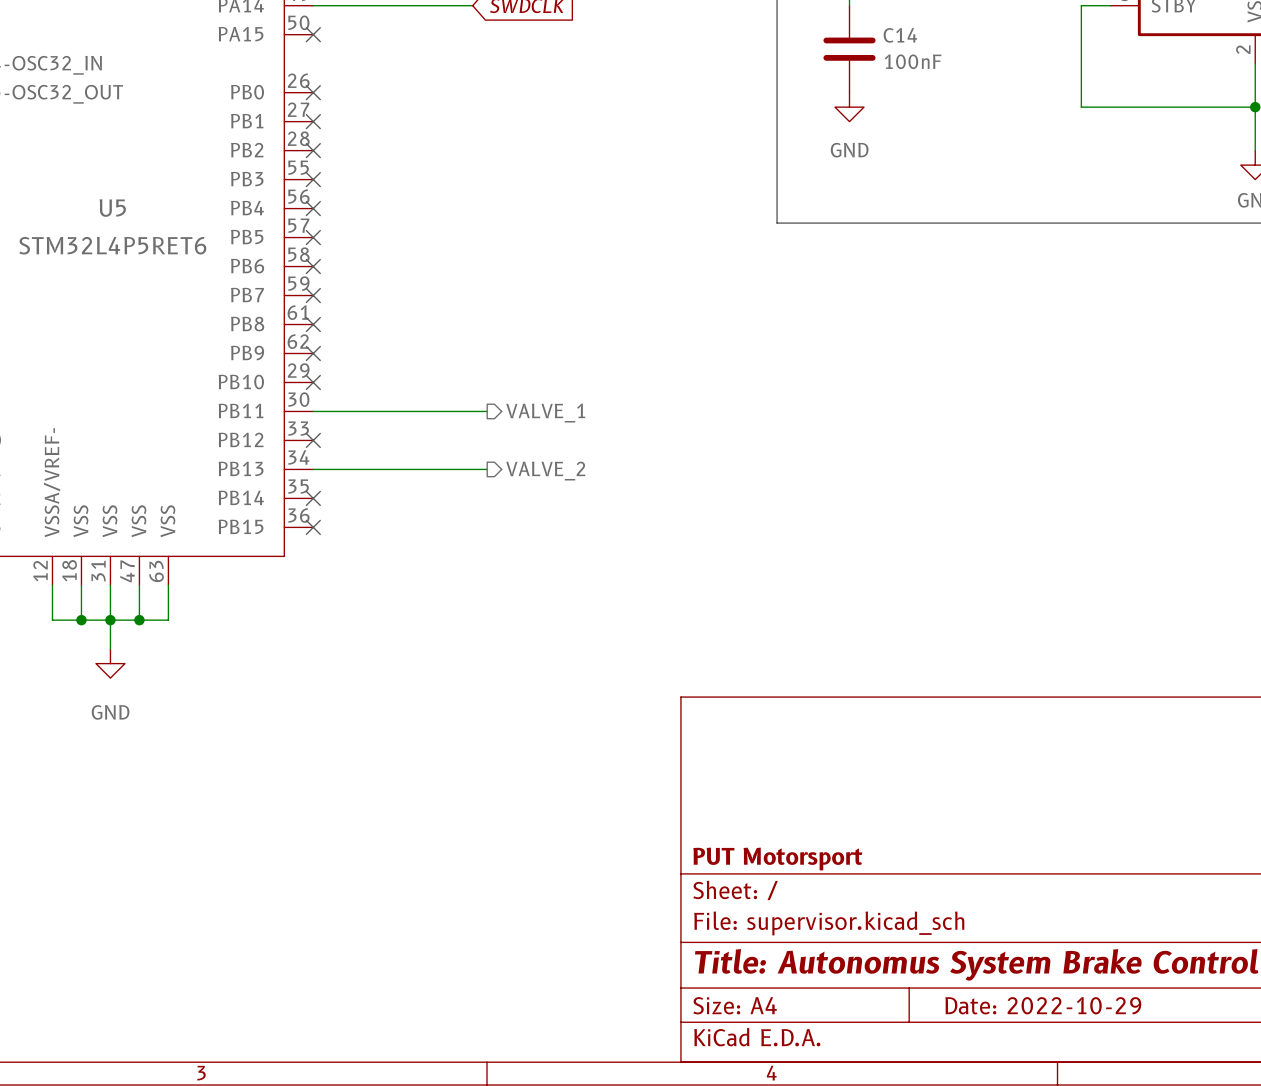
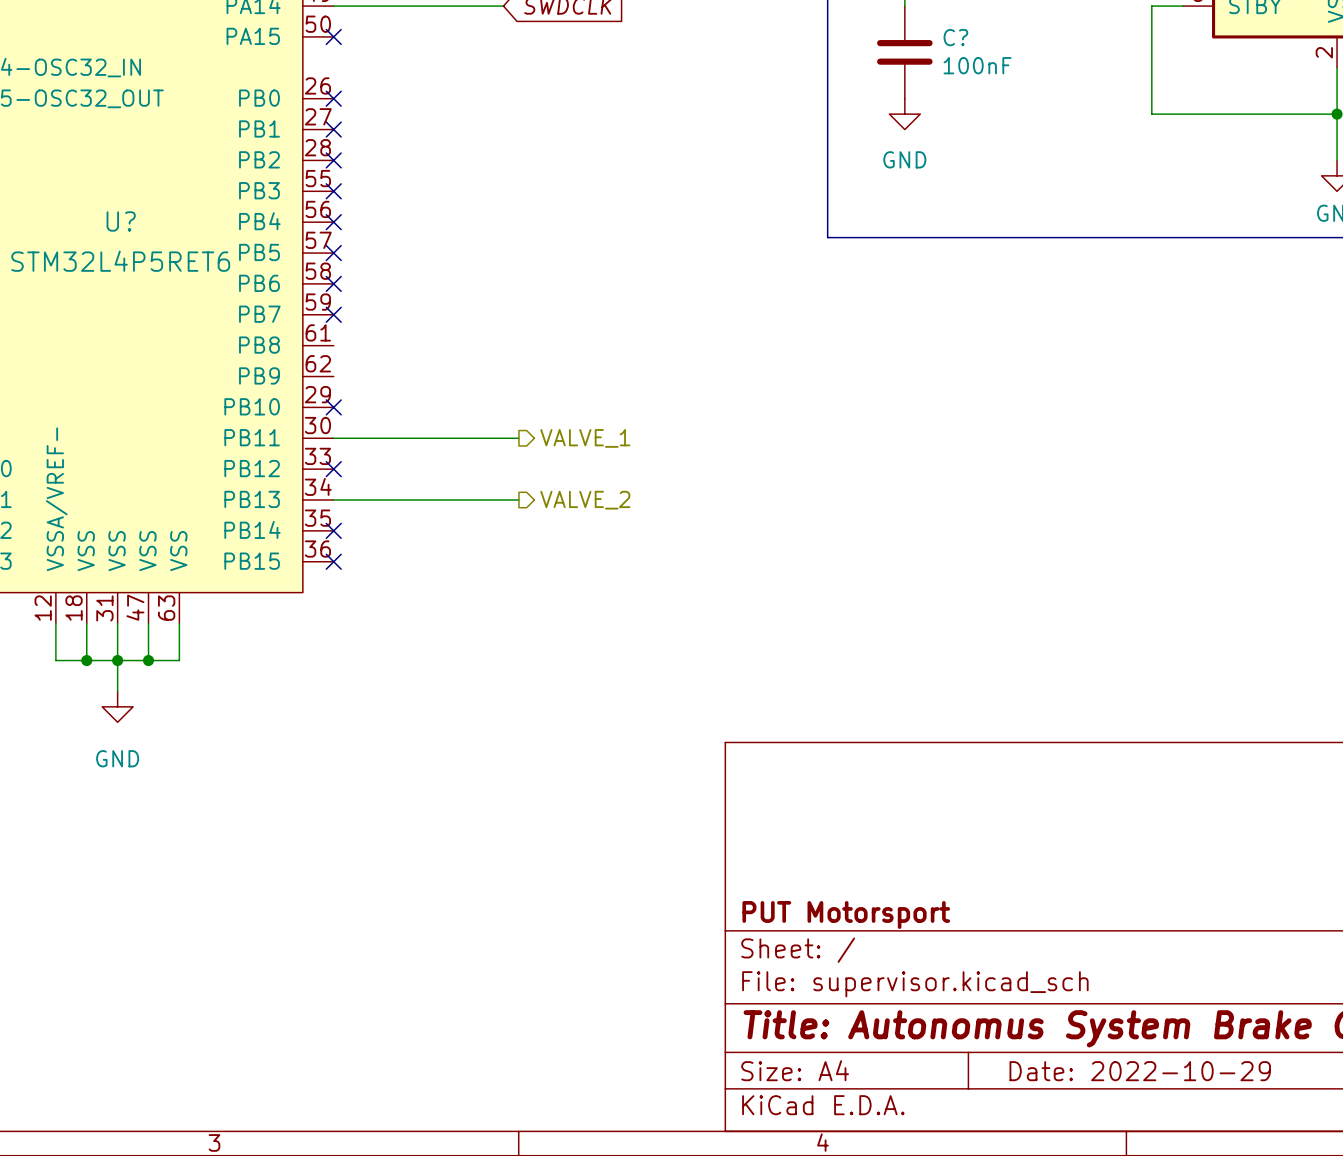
C14 name: C14 (900, 35) -> C? (955, 37)
U5 name: U5 (112, 208) -> U? (121, 221)
no-connect mark: (313, 324) -> none
no-connect mark: (313, 353) -> none

